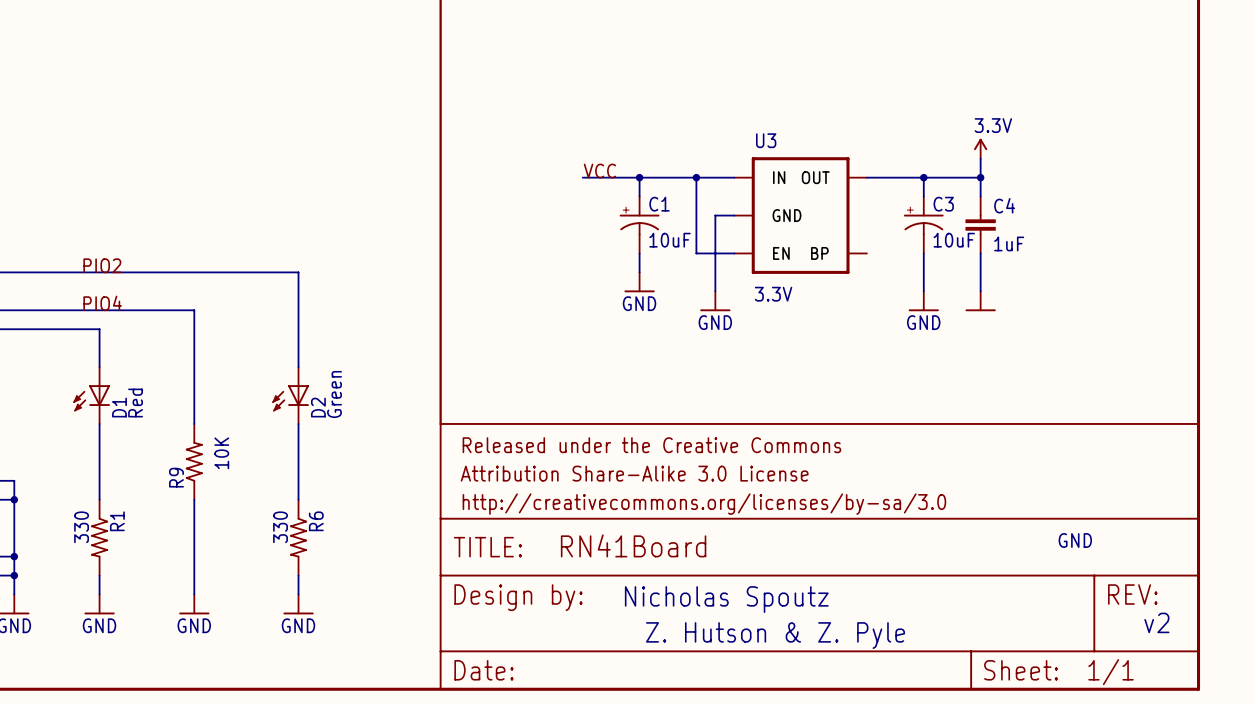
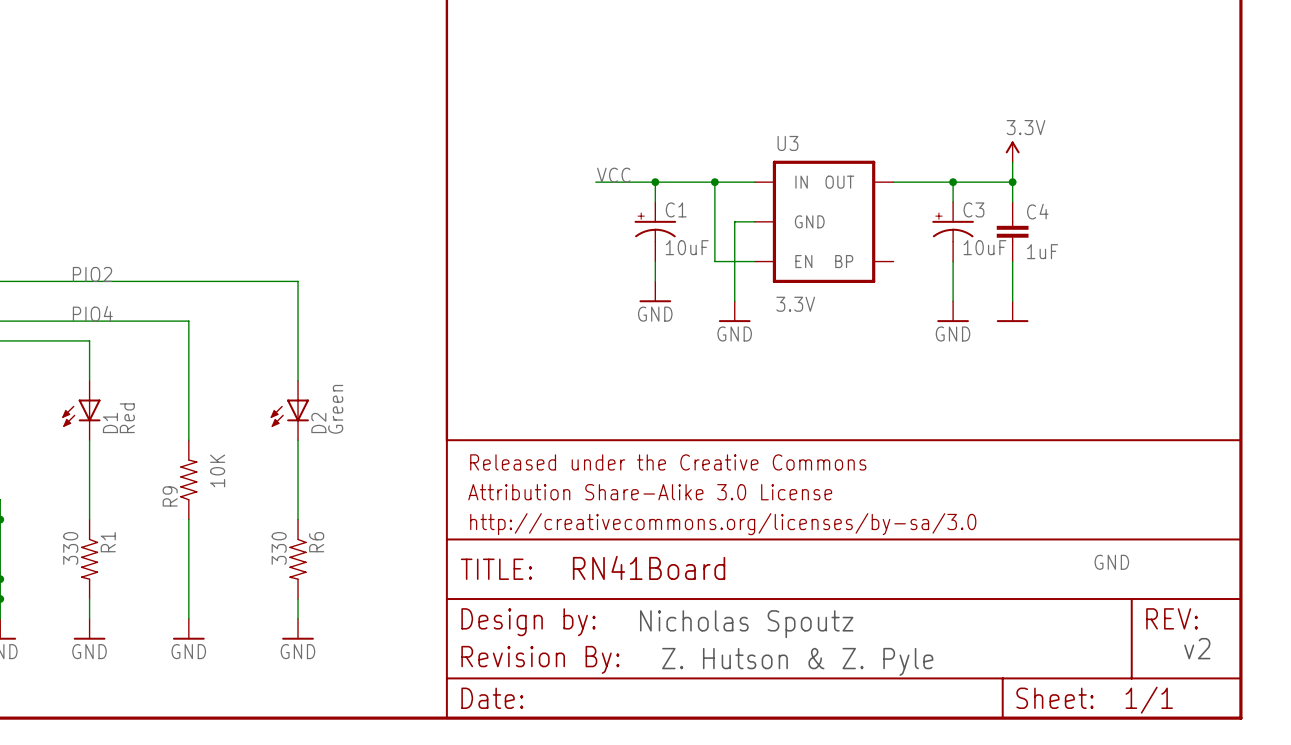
part: none -> (540, 659)

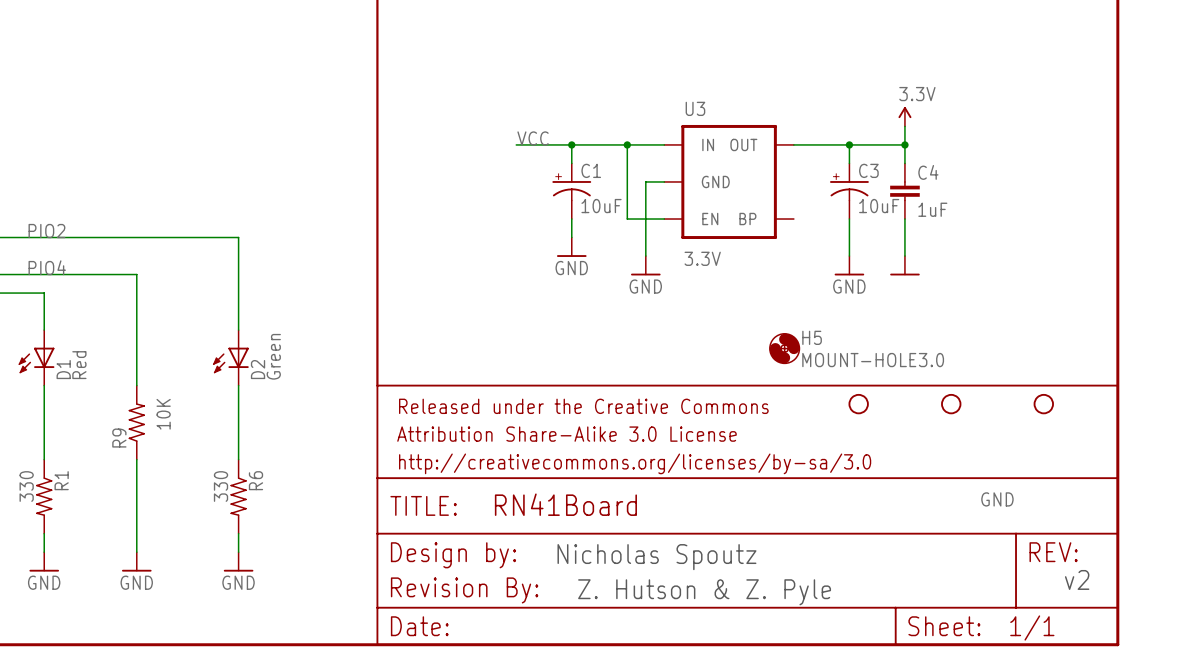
H5: none -> MOUNT-HOLE3.0 (784, 348)
part: none -> (858, 404)
part: none -> (951, 404)
part: none -> (1043, 404)

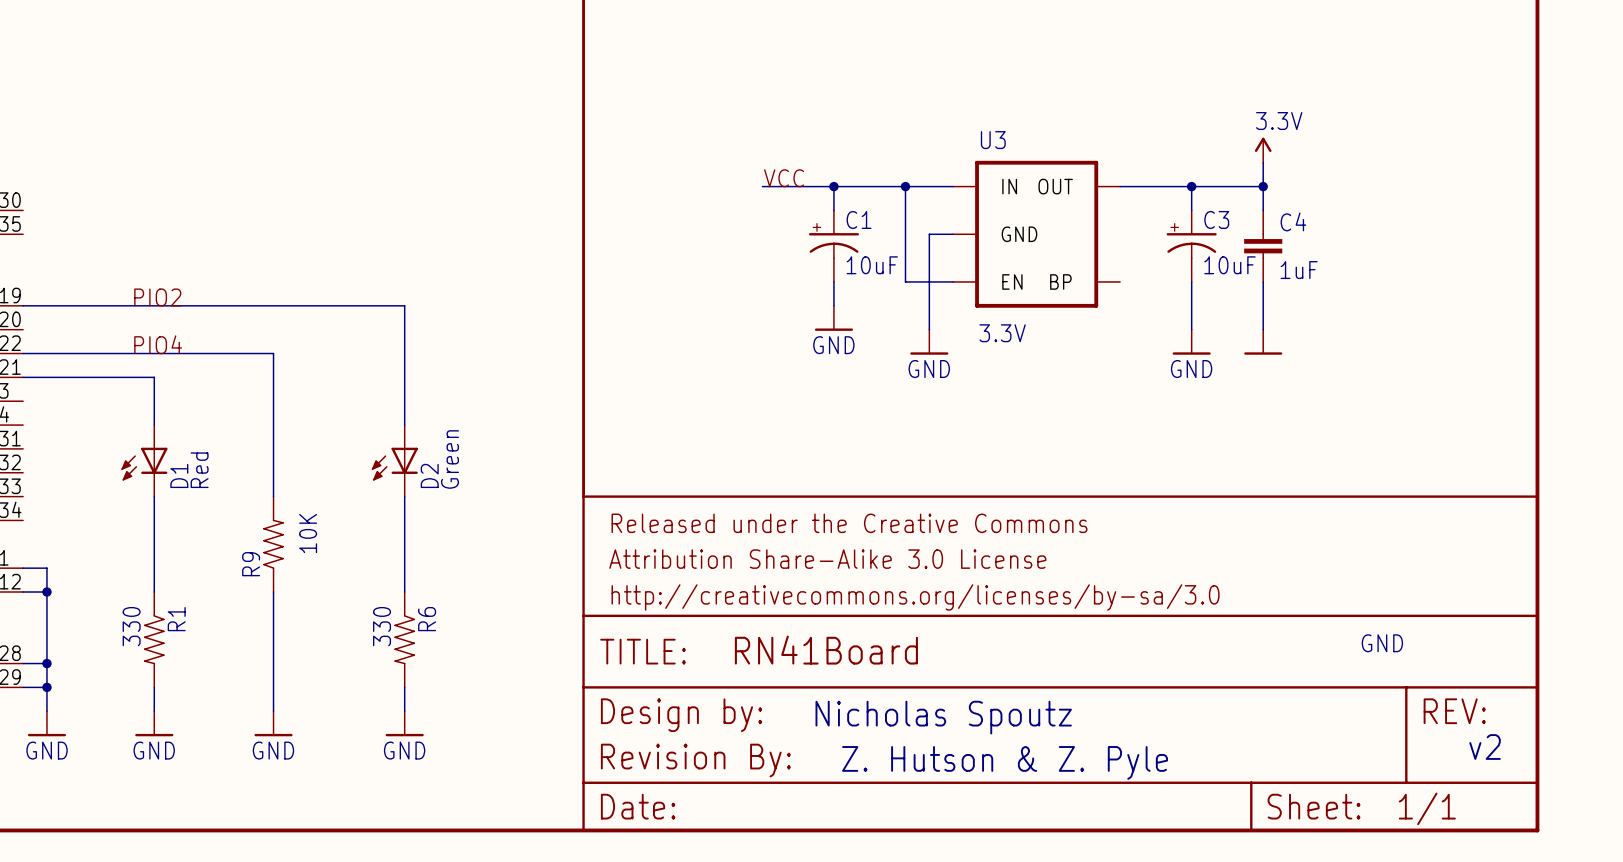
H5: MOUNT-HOLE3.0 (784, 348) -> none
part: (858, 404) -> none
part: (951, 404) -> none
part: (1043, 404) -> none

